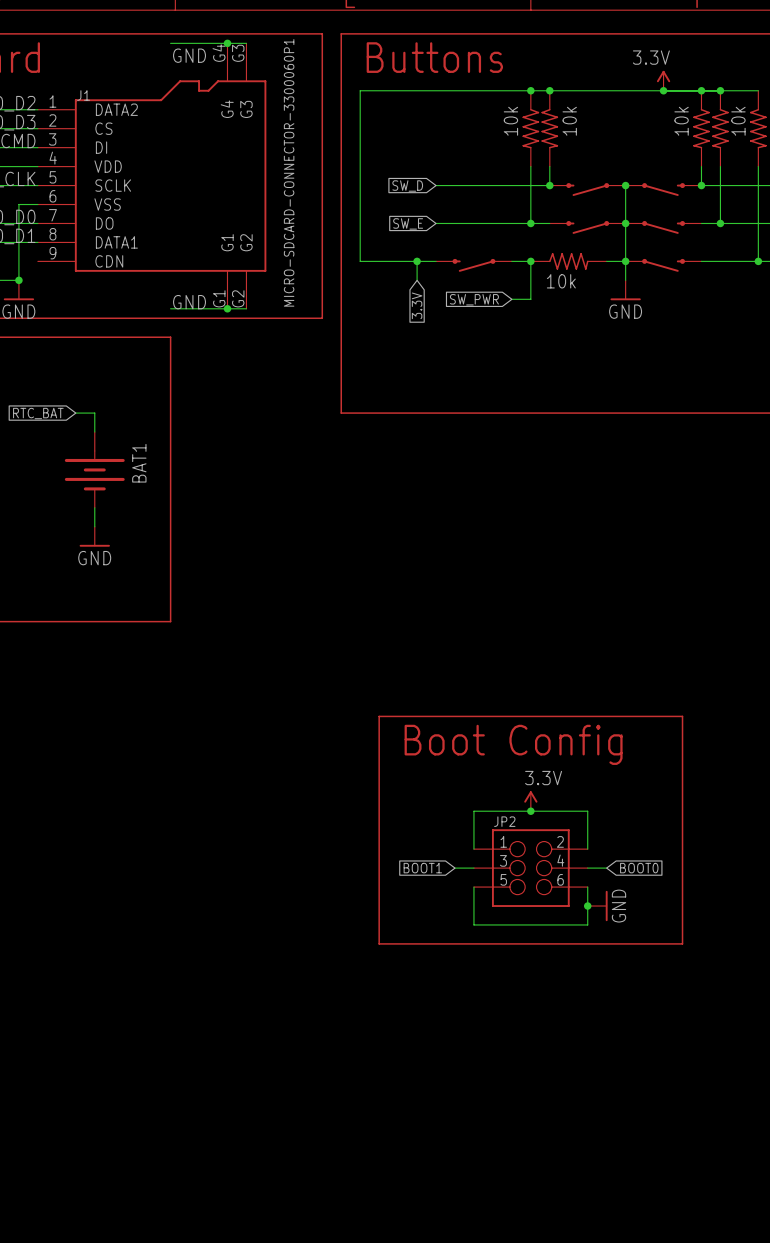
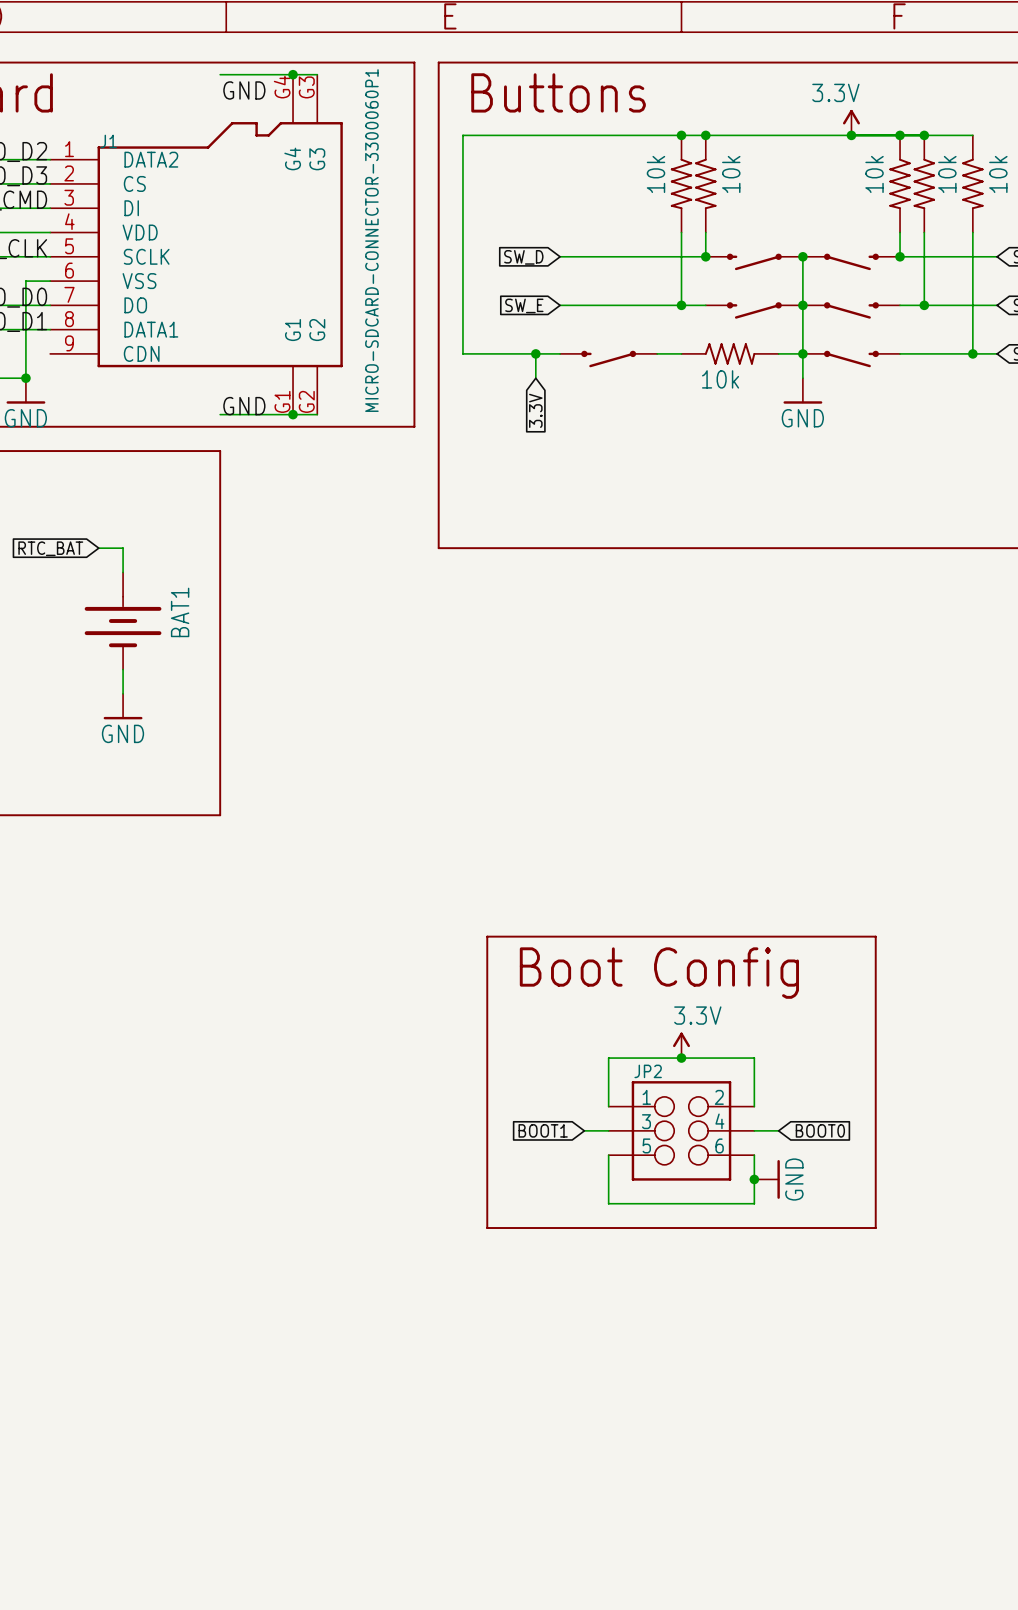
wire: (530, 261) (530, 299) (511, 299) -> none
junction: (530, 261) -> none
global label: SW_PWR (474, 299) -> none

